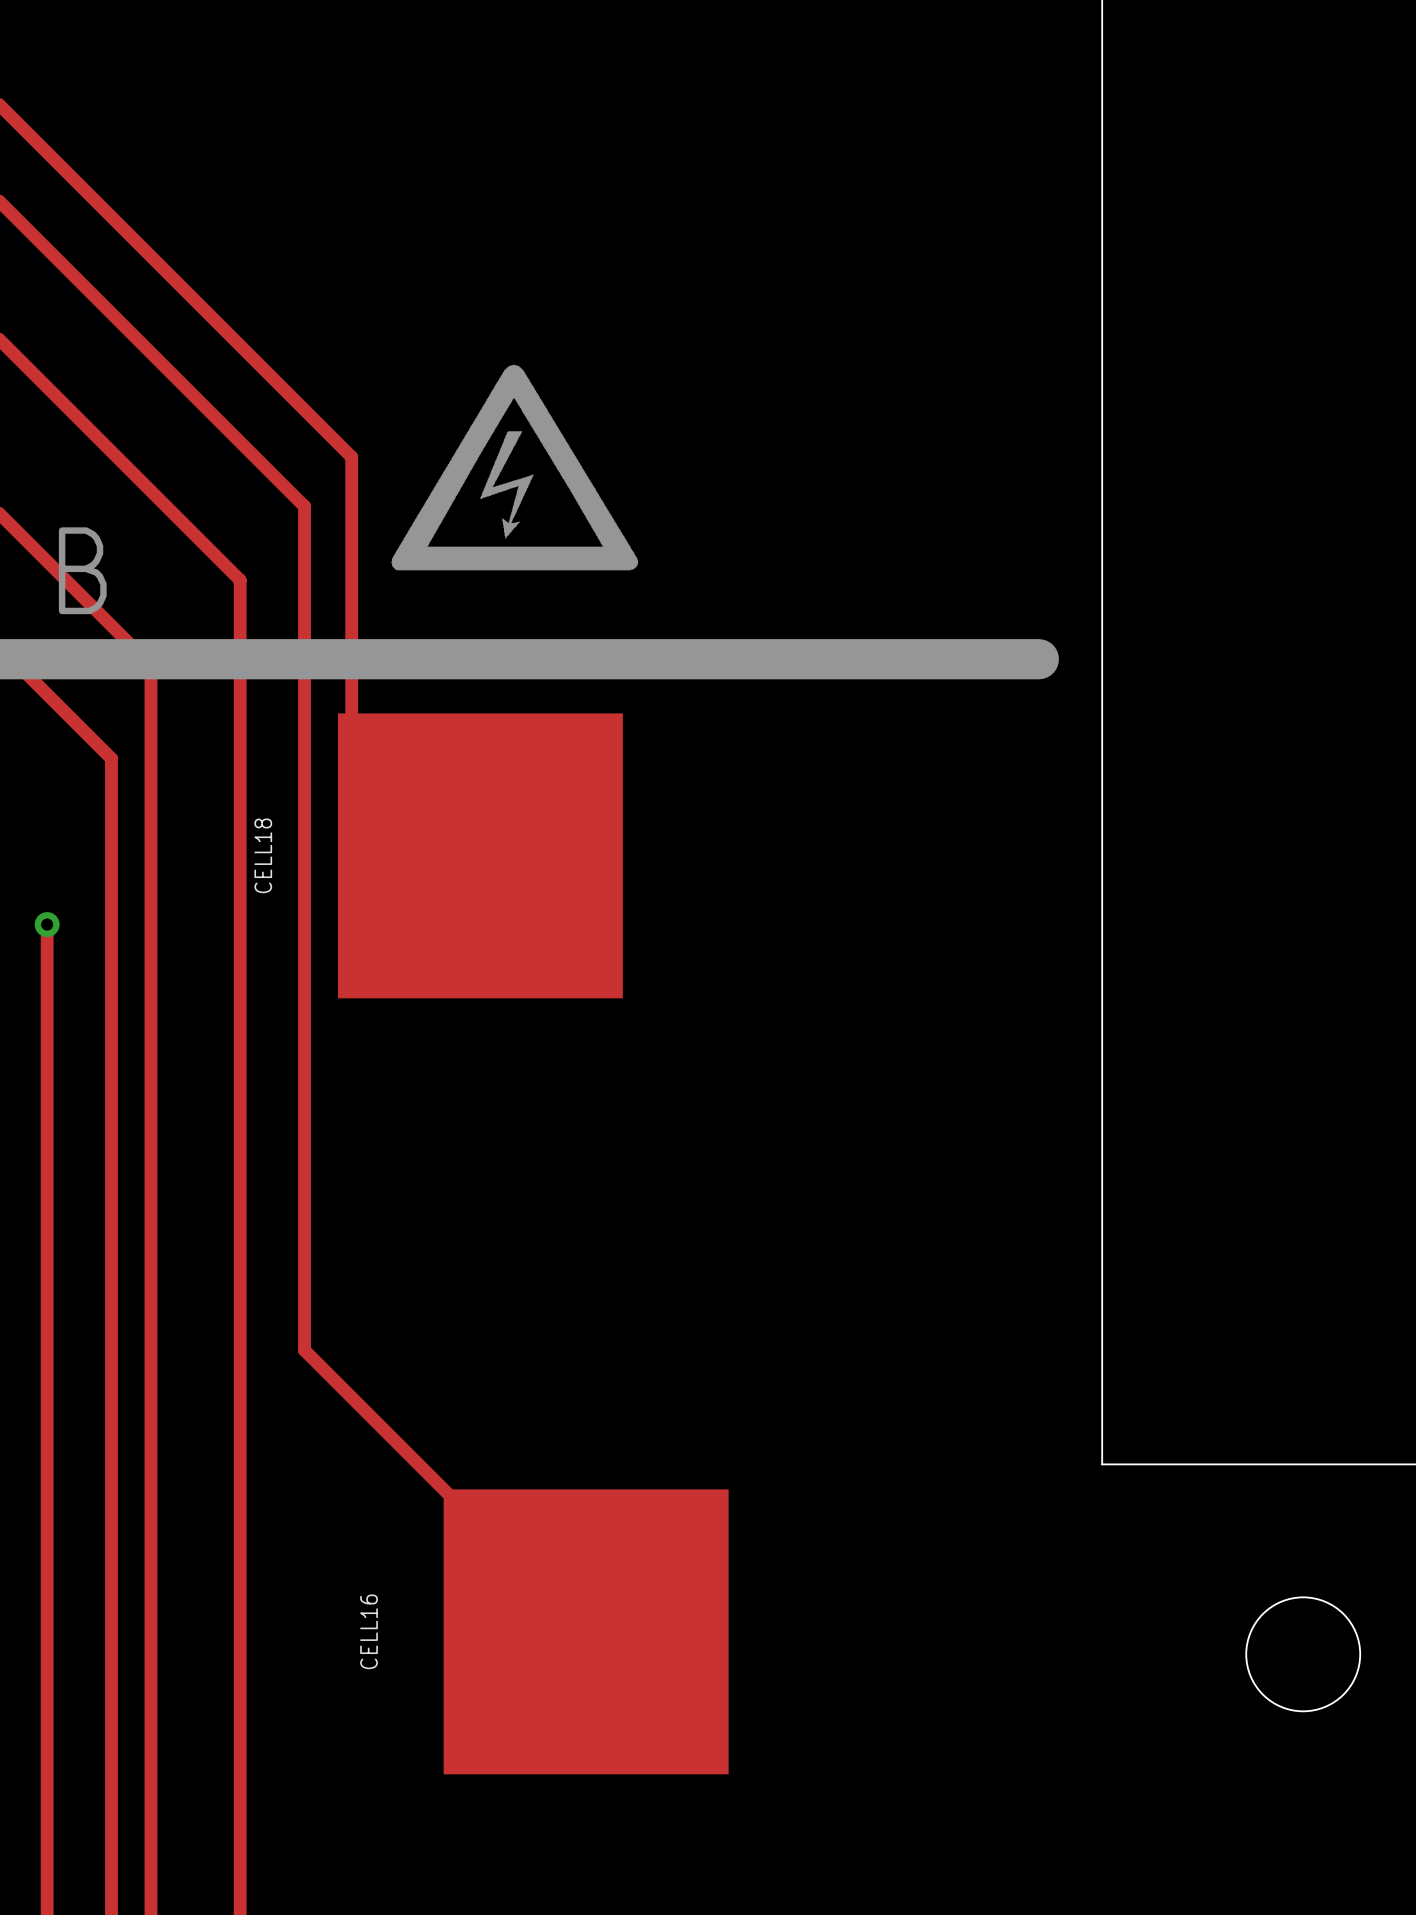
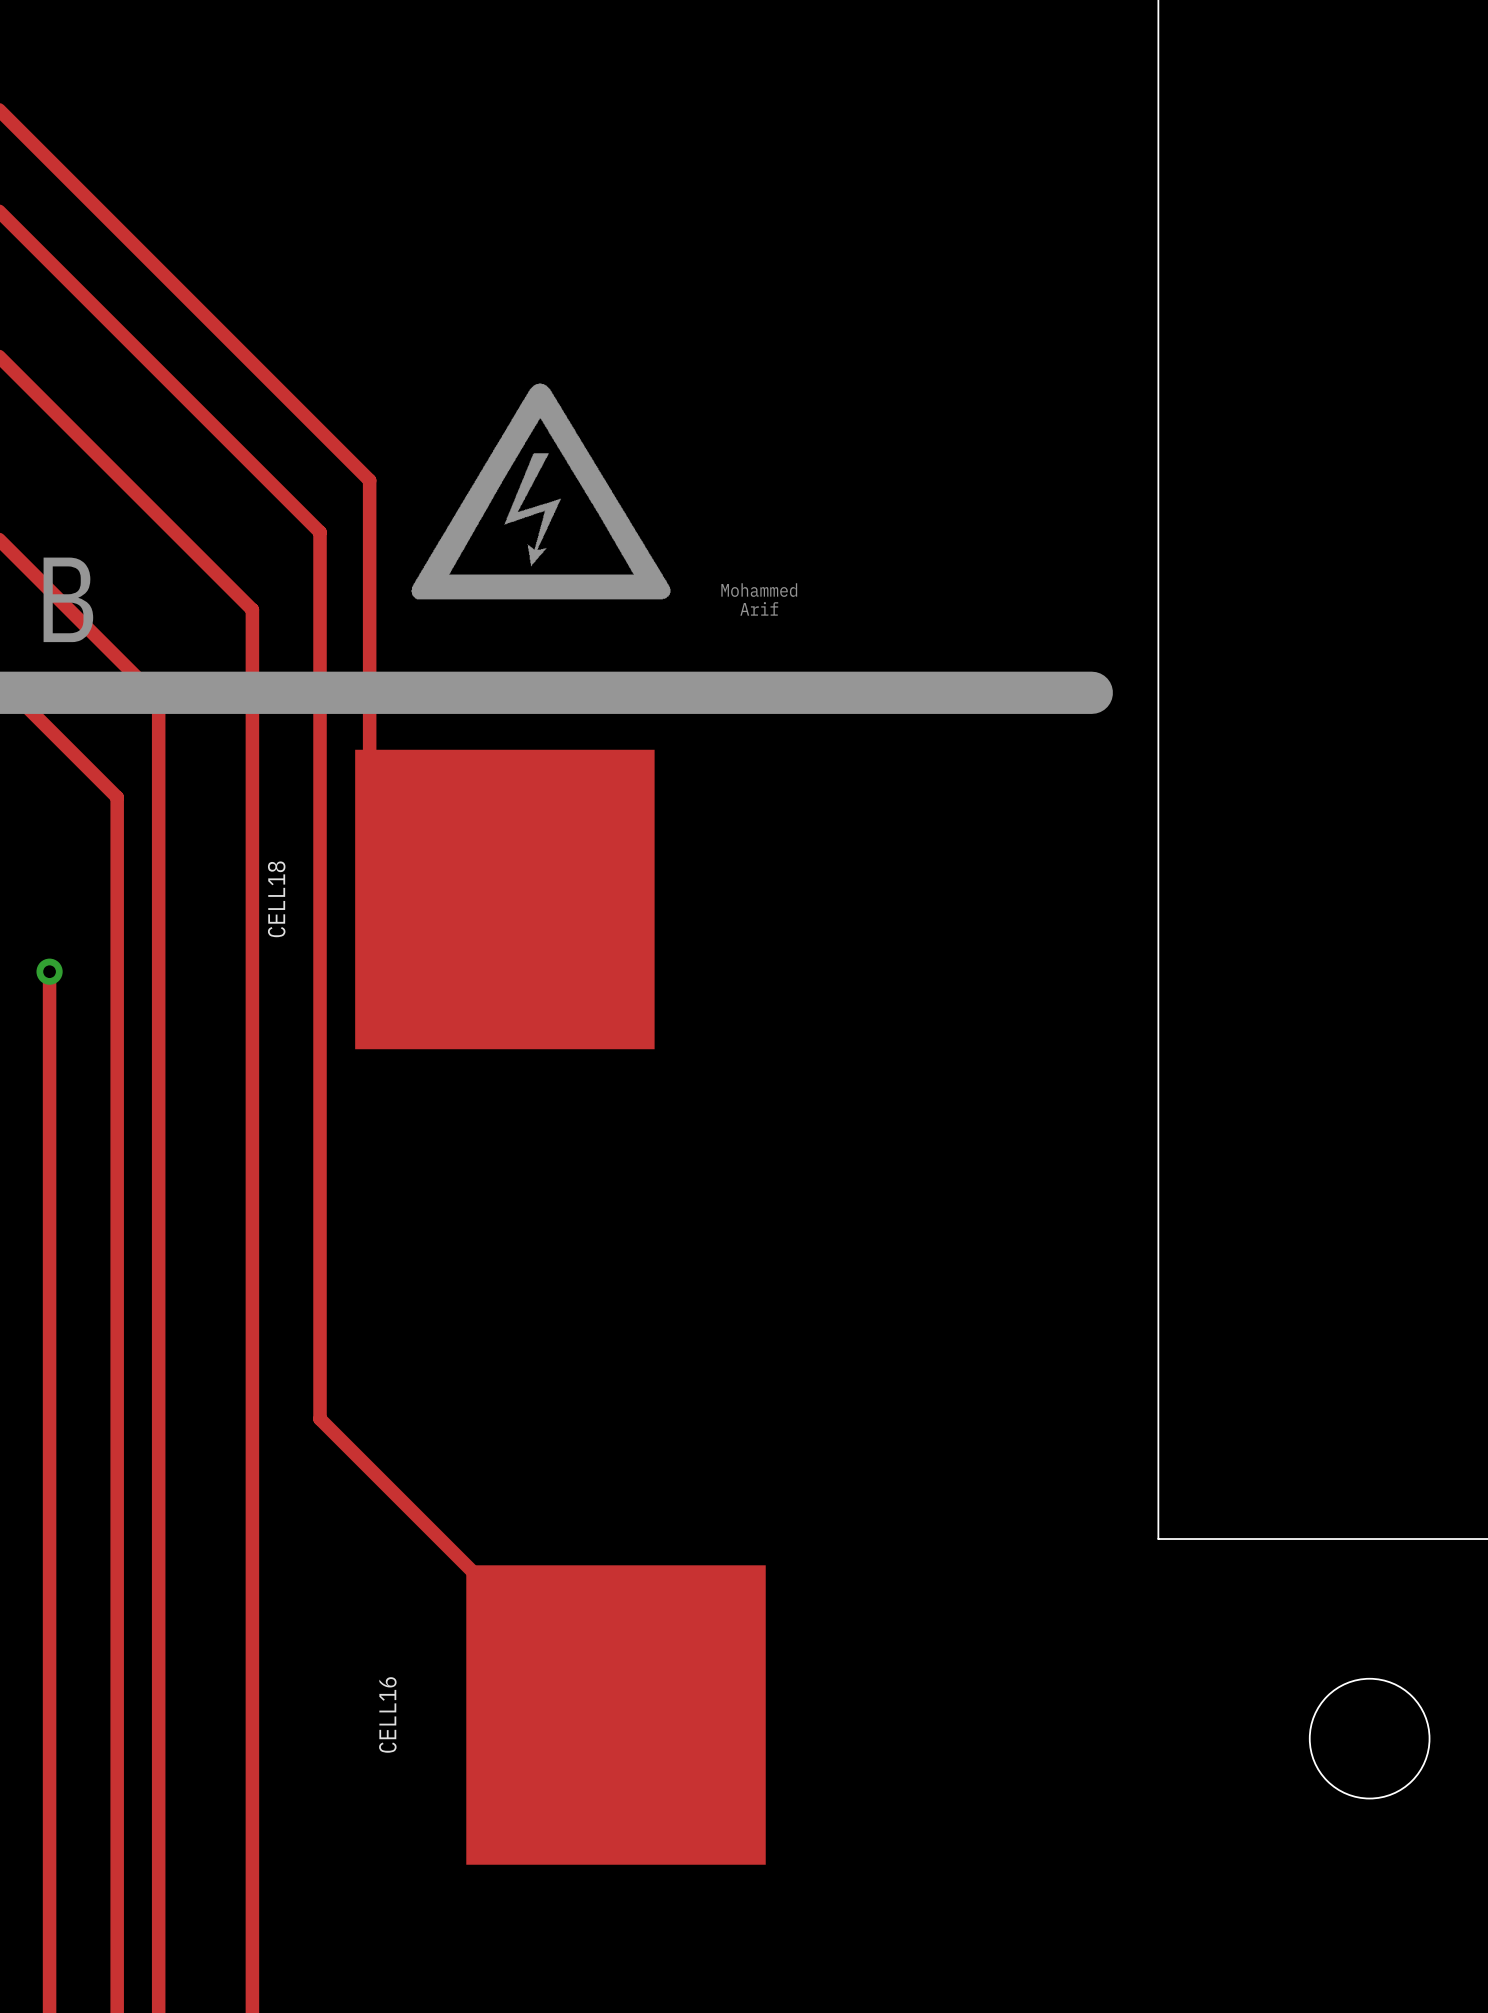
text: none -> Mohammed (759, 590)
text: none -> Arif (759, 608)

